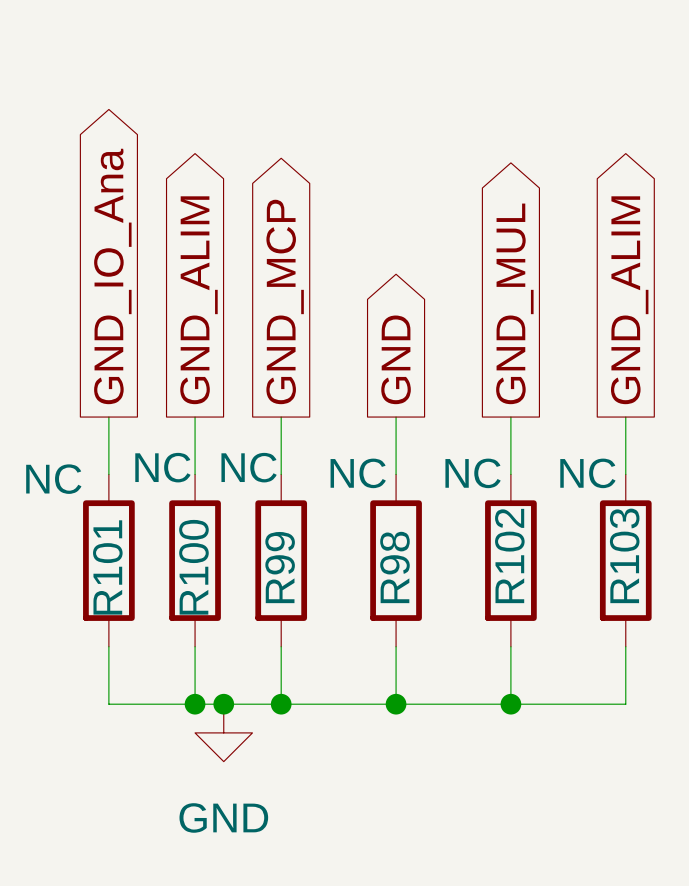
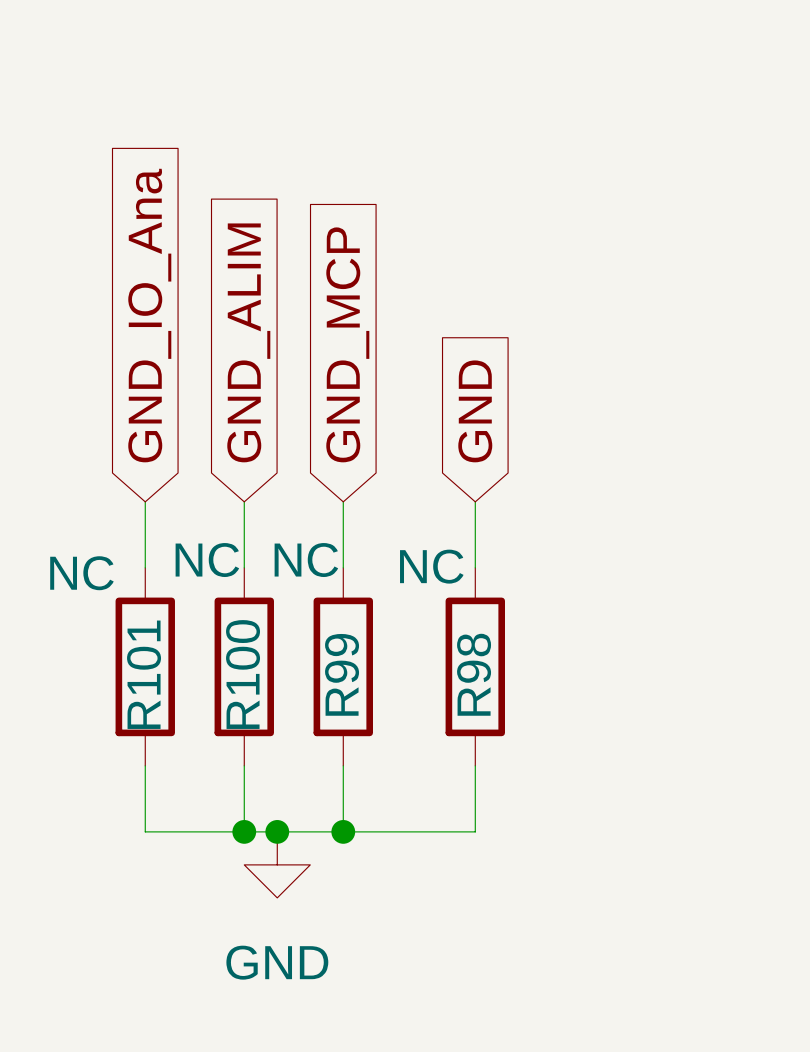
global label shape: output (112, 276) -> input (149, 315)
global label shape: output (198, 300) -> input (248, 342)
global label: GND_ALIM (629, 300) -> none
global label shape: output (285, 301) -> input (347, 344)
global label: GND_MUL (514, 303) -> none
global label shape: output (396, 359) -> input (475, 411)
wire: (510, 417) (510, 474) -> none
wire: (625, 417) (625, 474) -> none
R102: NC (510, 560) -> none
R103: NC (625, 560) -> none
wire: (510, 646) (510, 704) -> none
wire: (625, 646) (625, 704) (396, 704) -> none
junction: (396, 704) -> none
junction: (510, 704) -> none

